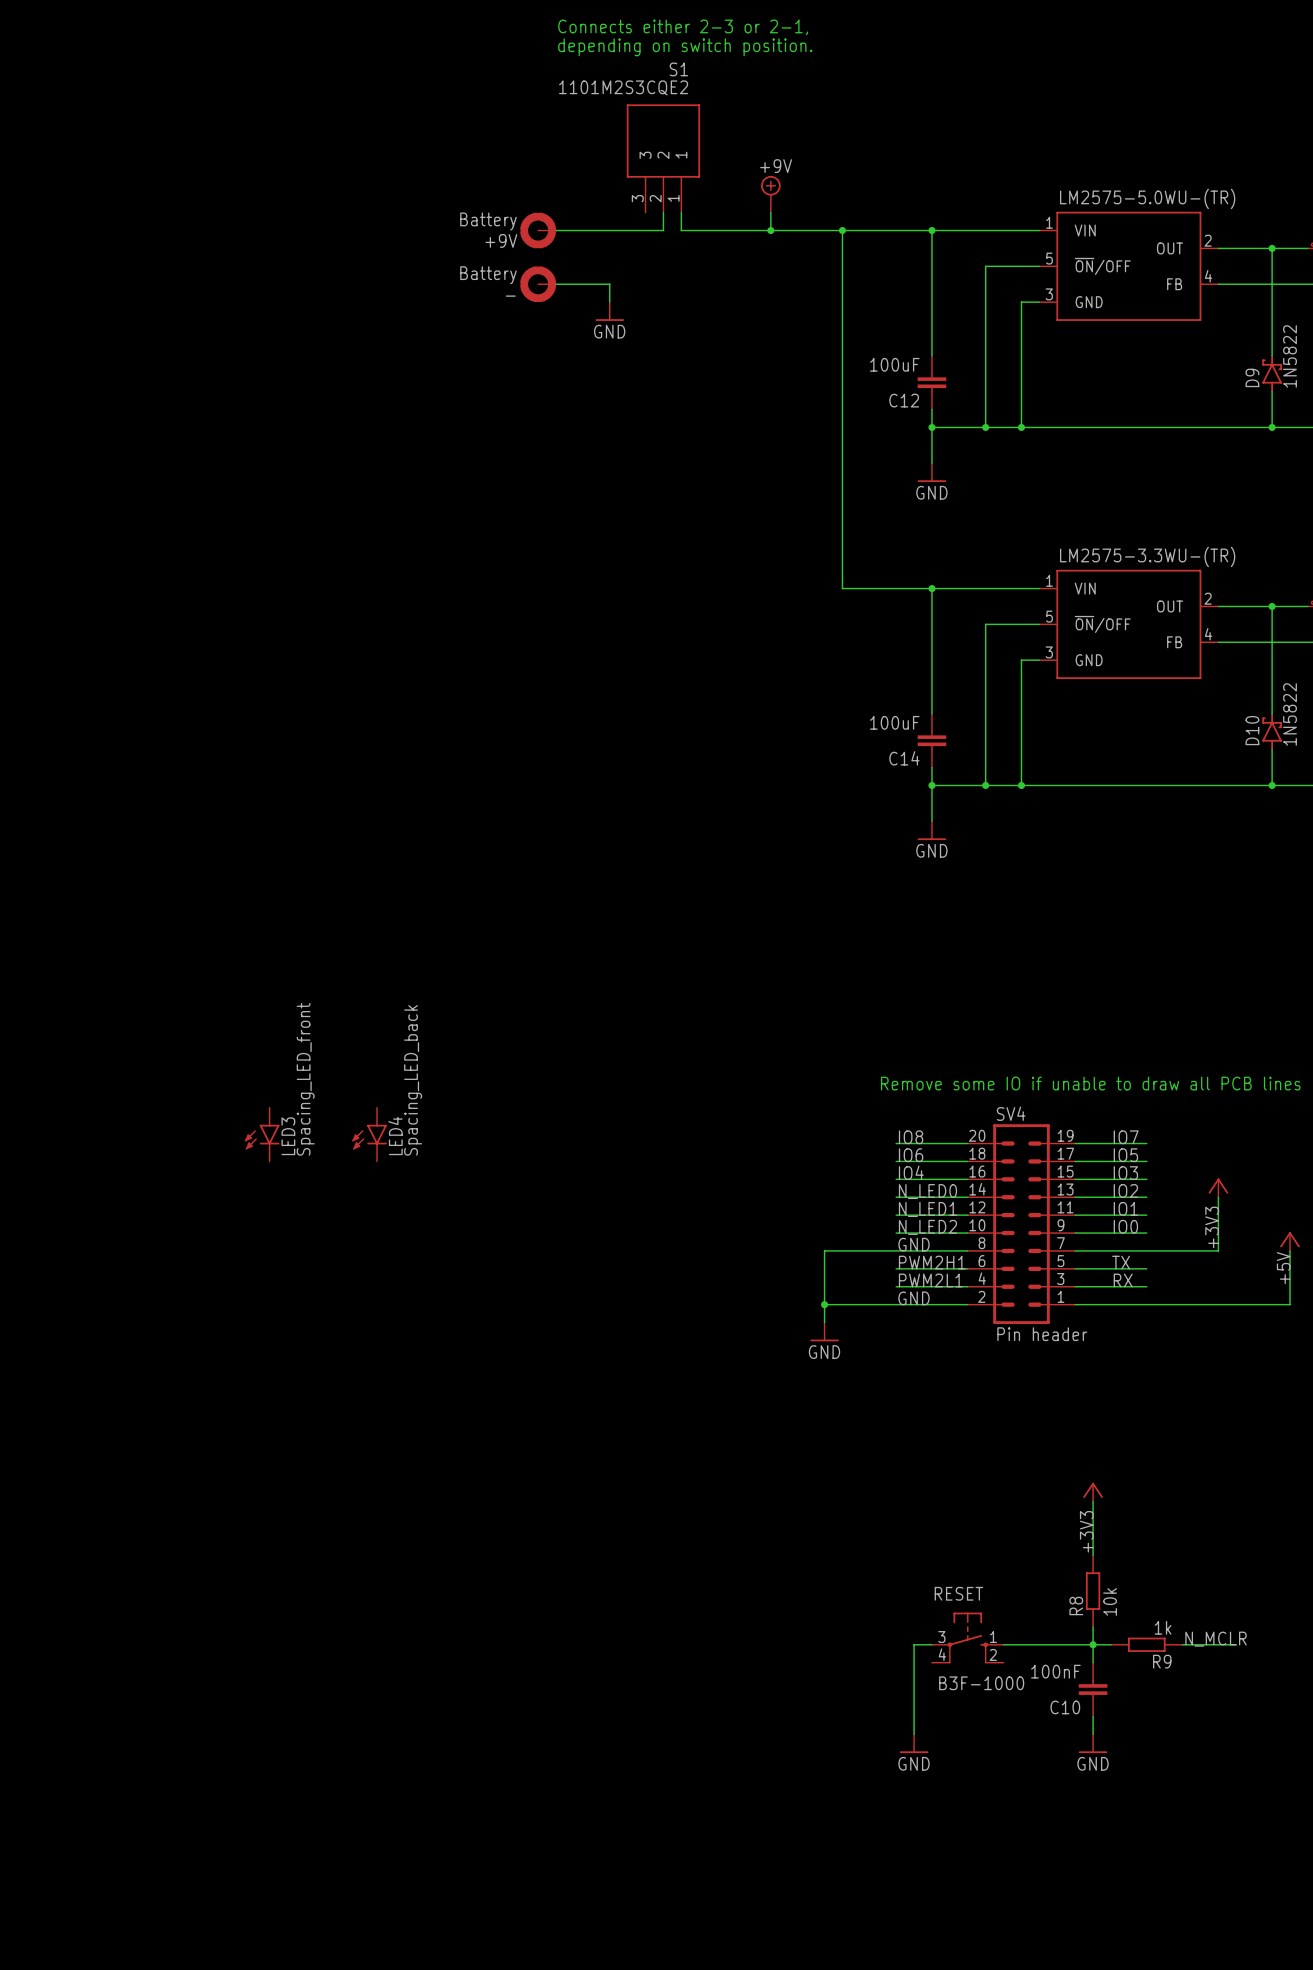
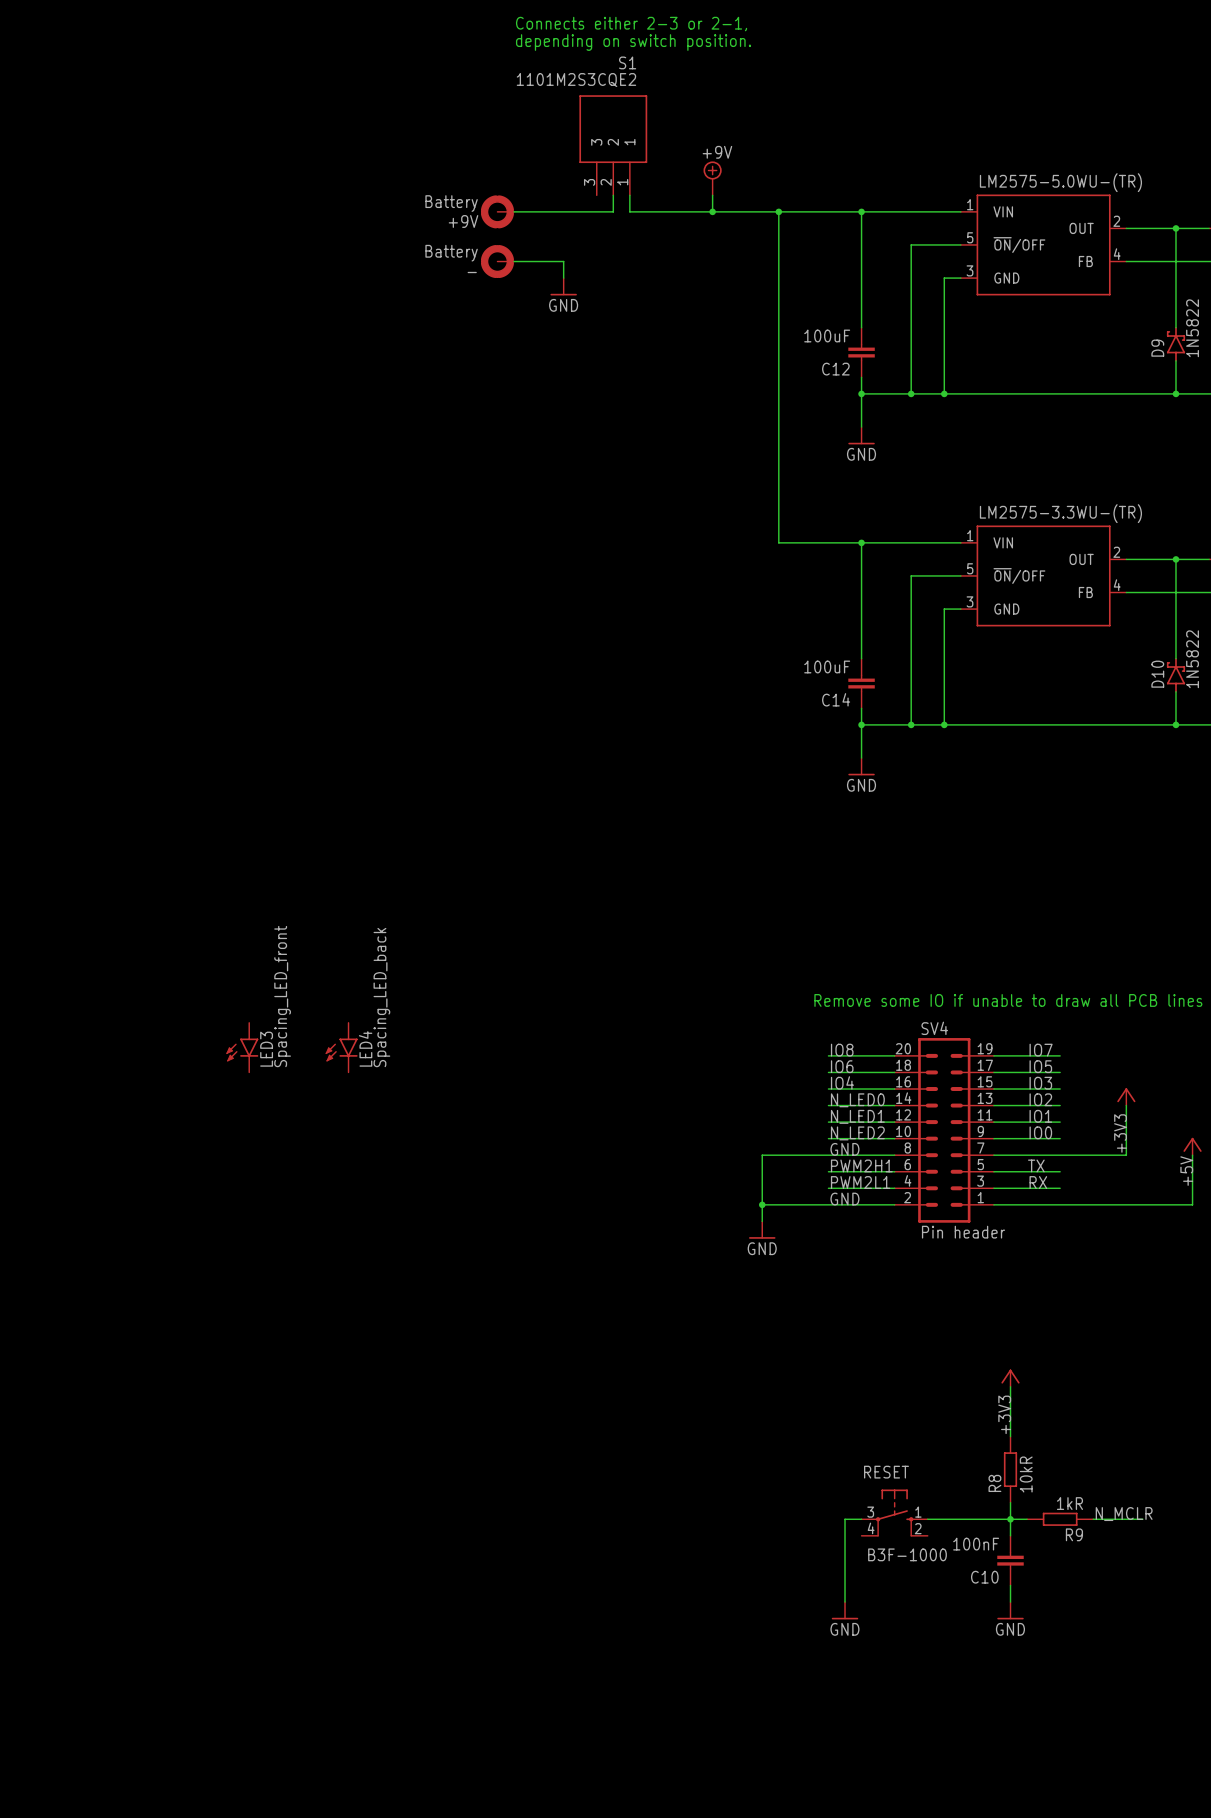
R8 value: 10k (1110, 1601) -> 10kR (1026, 1474)
R9 value: 1k (1163, 1627) -> 1kR (1069, 1503)

